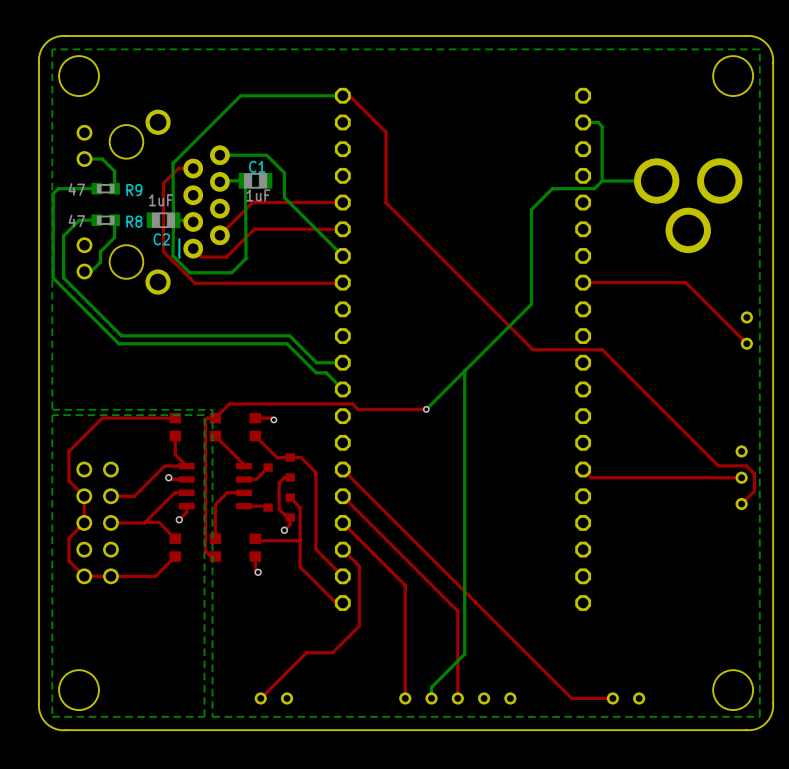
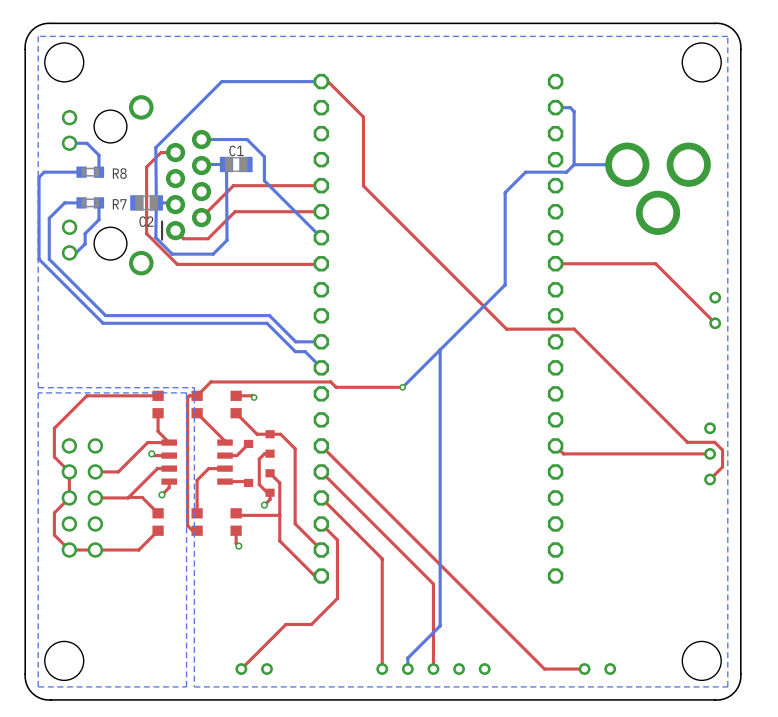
R9 value: 47 (76, 189) -> none
R9 name: R9 (134, 190) -> R8 (119, 173)
C1 value: 1uF (258, 195) -> none
C2 value: 1uF (161, 200) -> none
R8 value: 47 (76, 220) -> none
R8 name: R8 (134, 221) -> R7 (119, 204)

